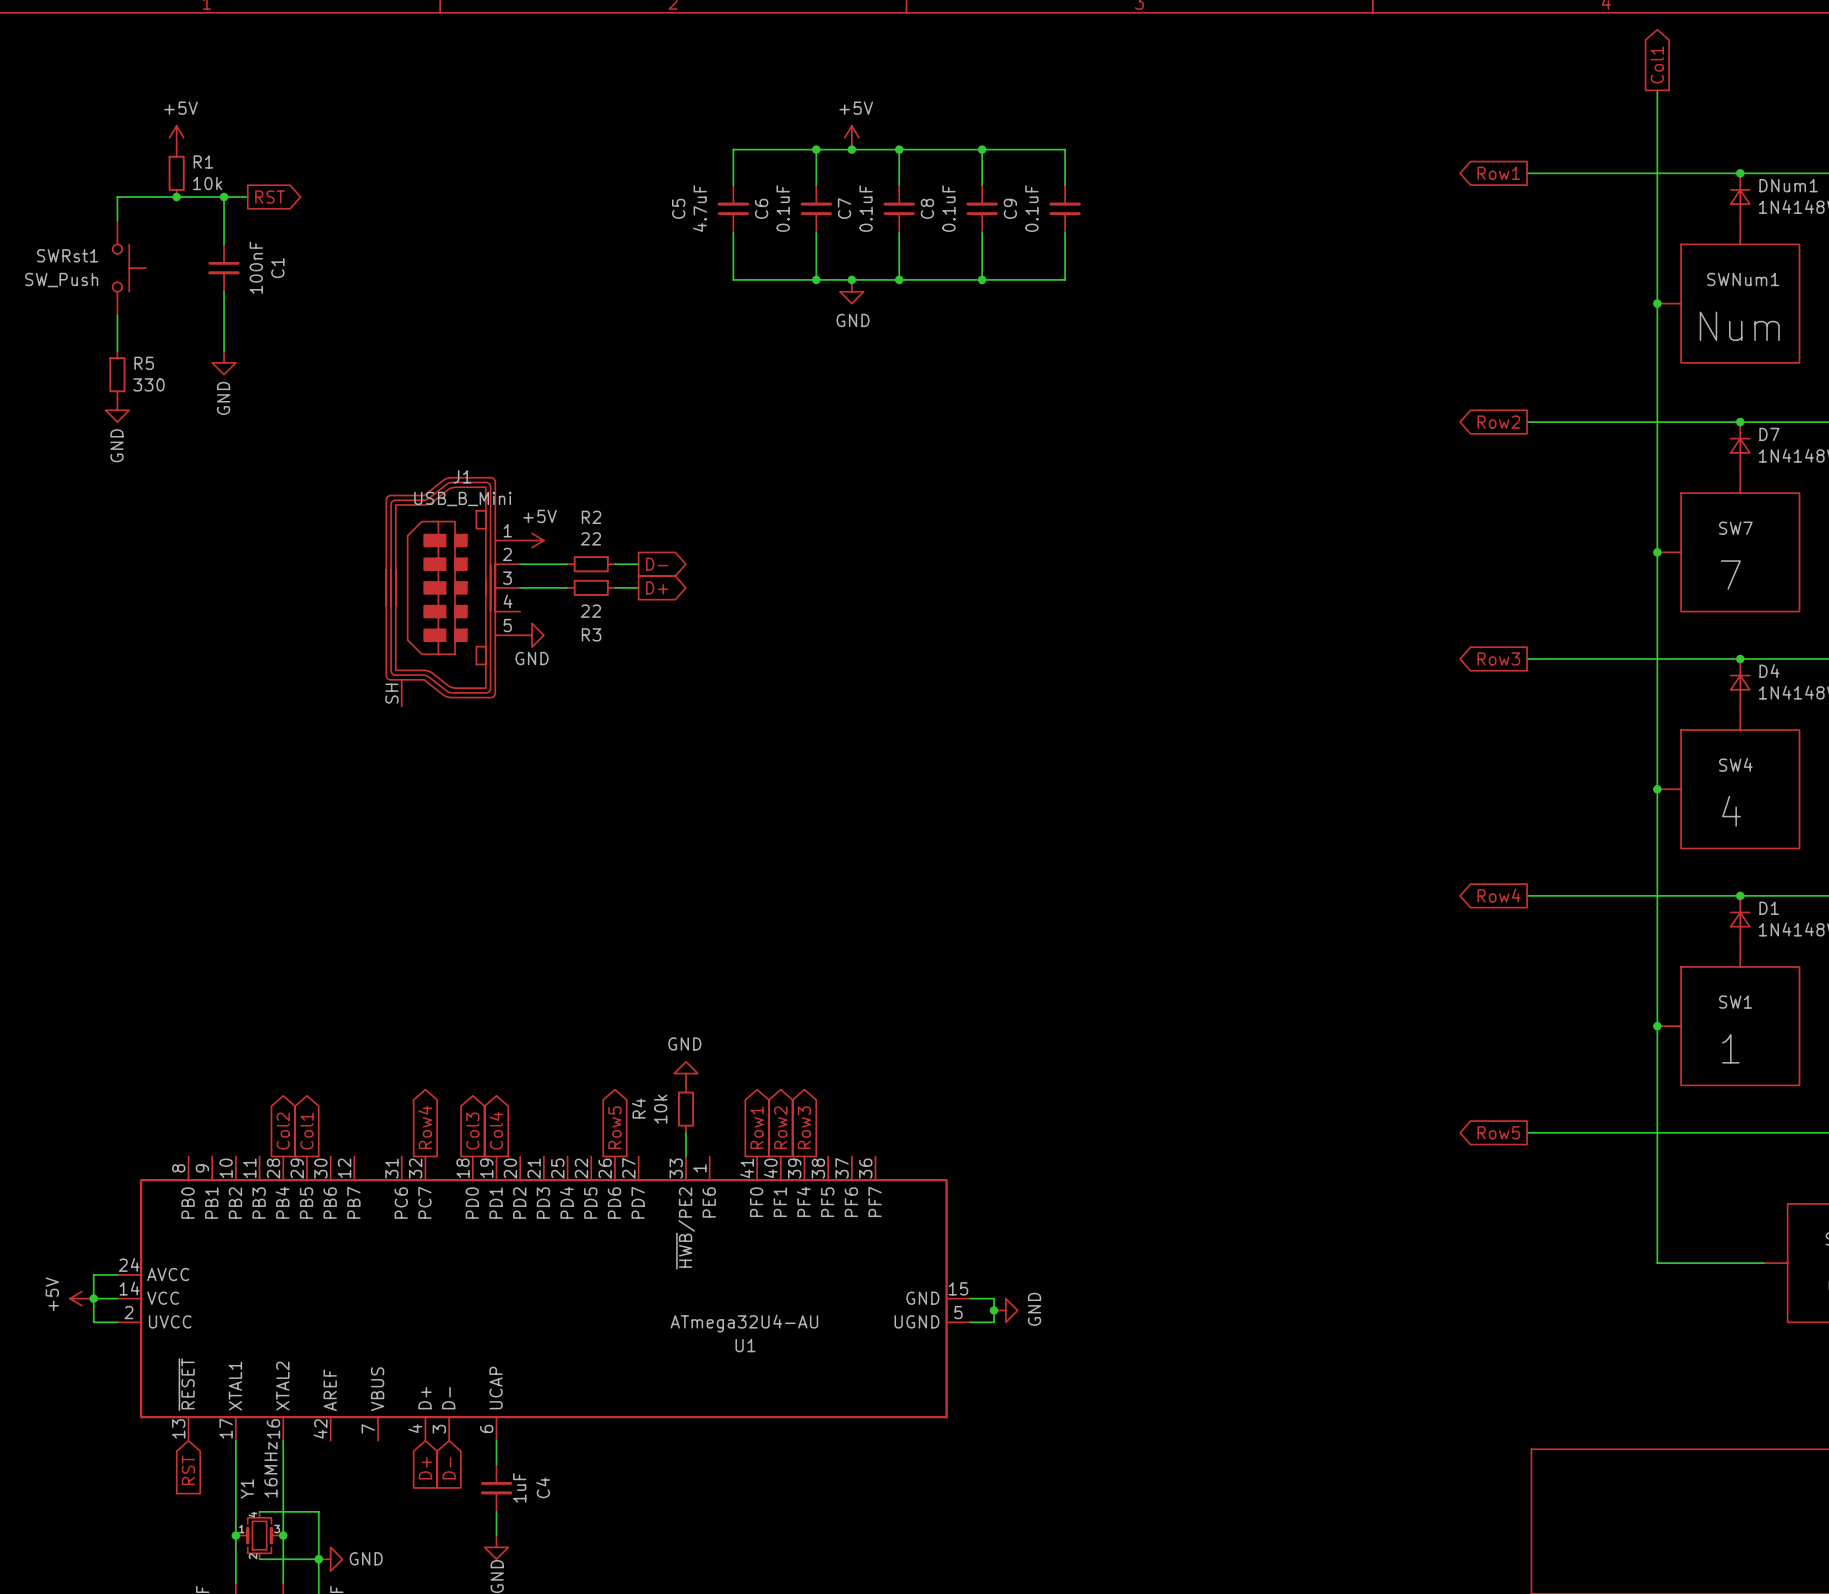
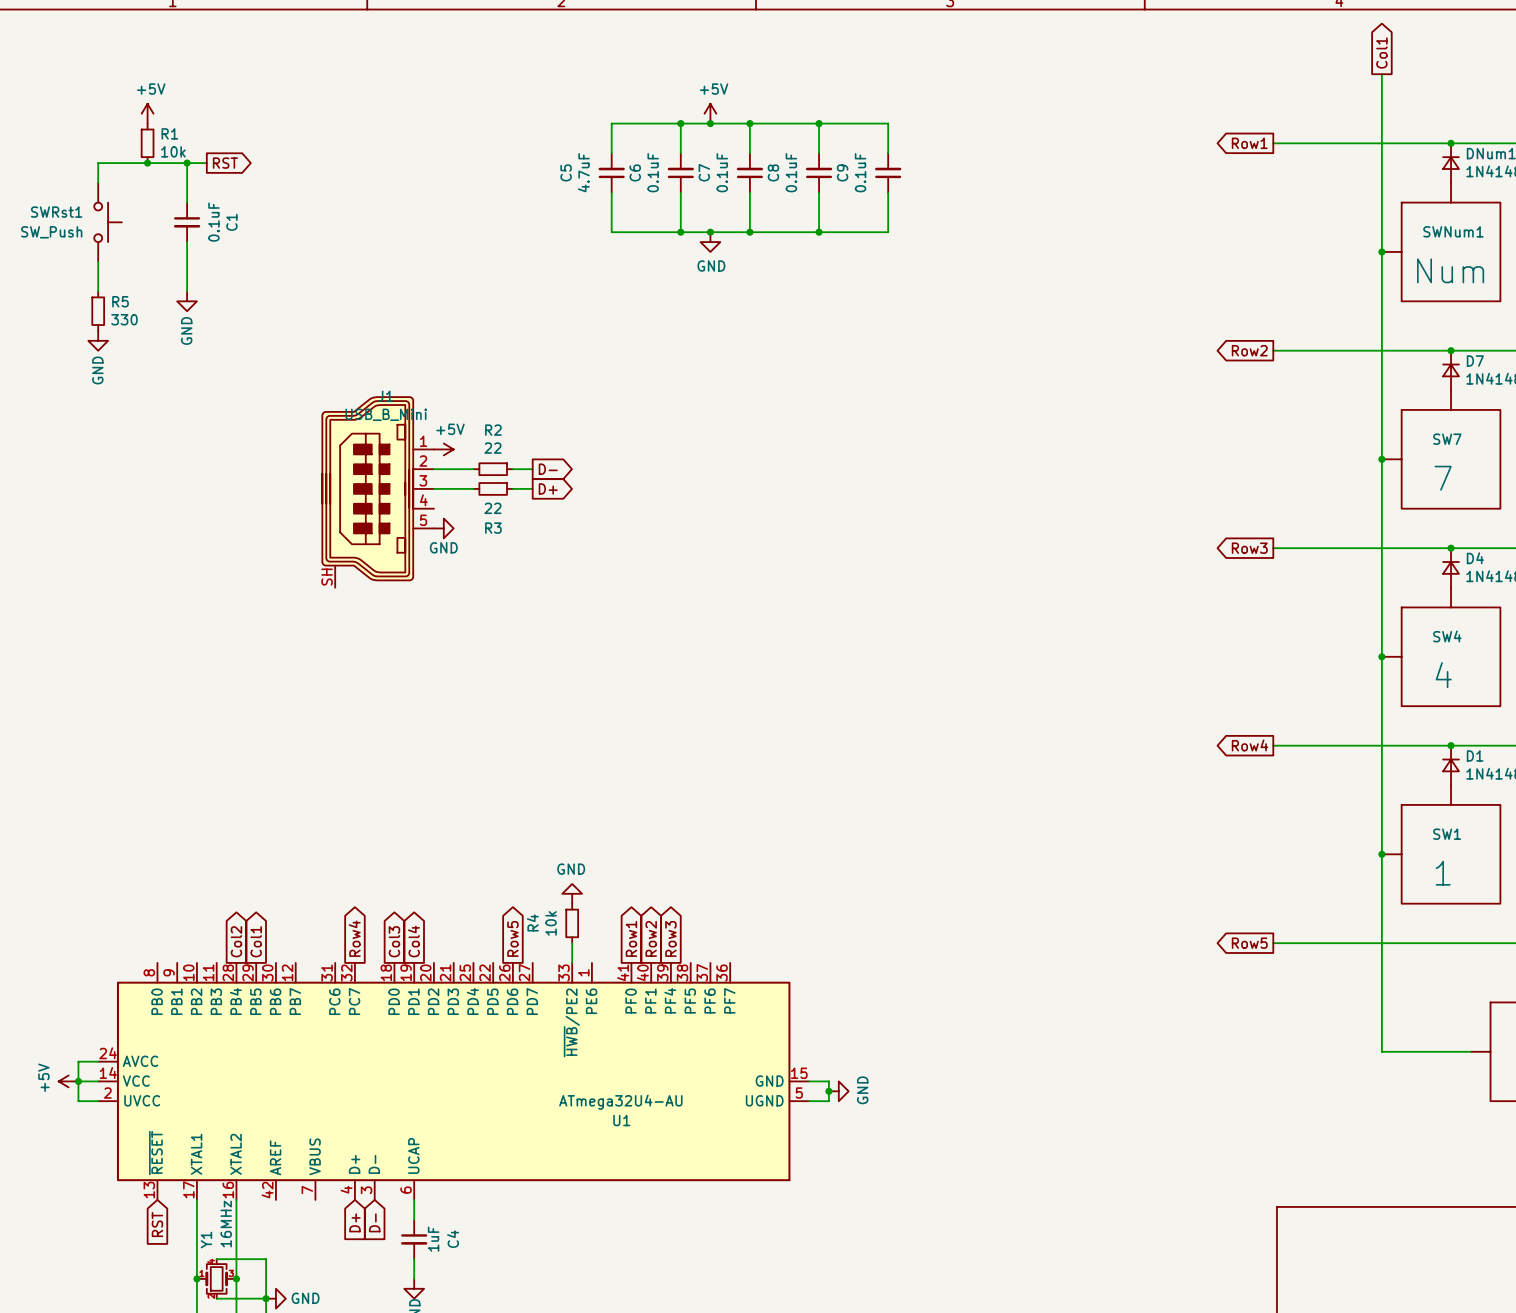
C1 value: 100nF (256, 267) -> 0.1uF (213, 222)

